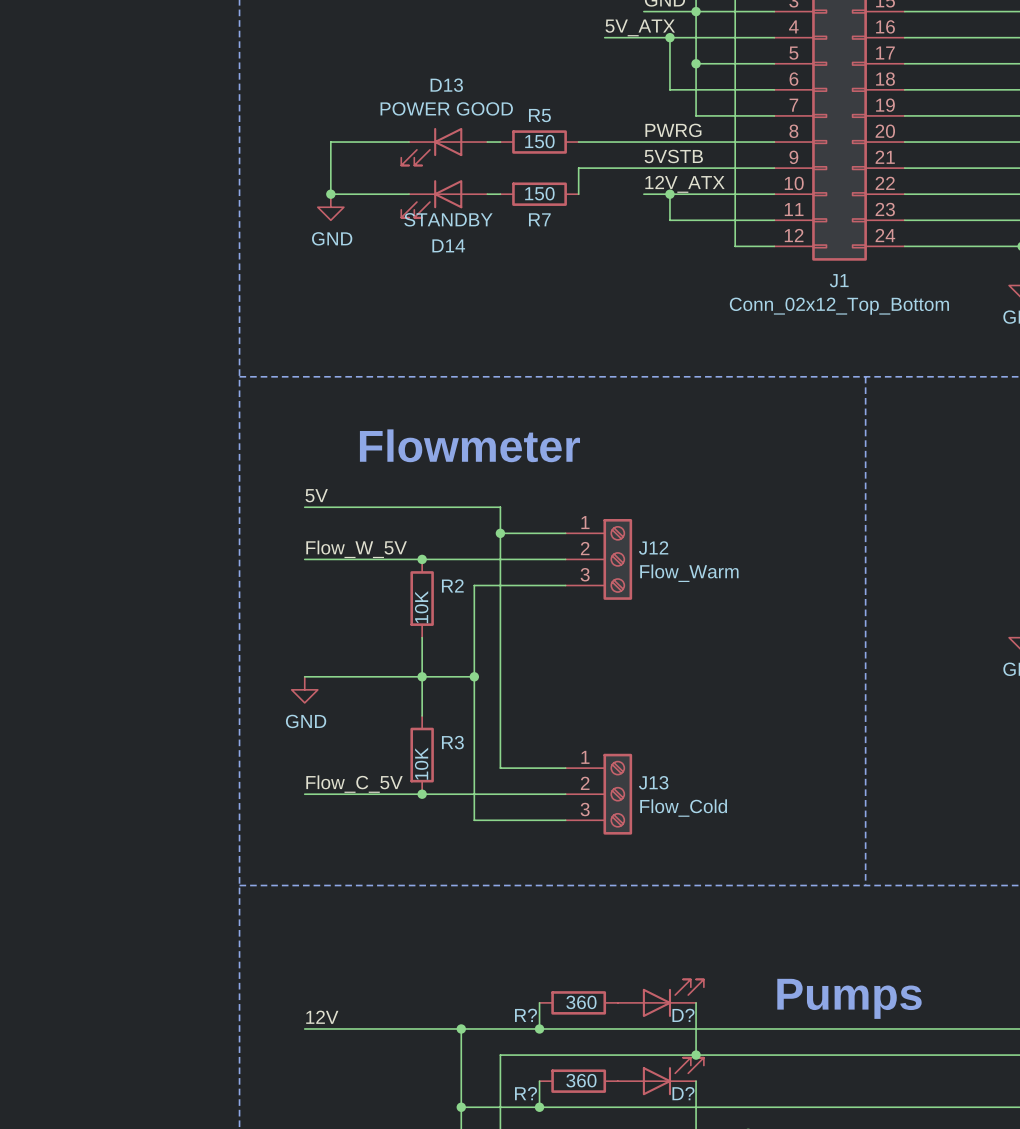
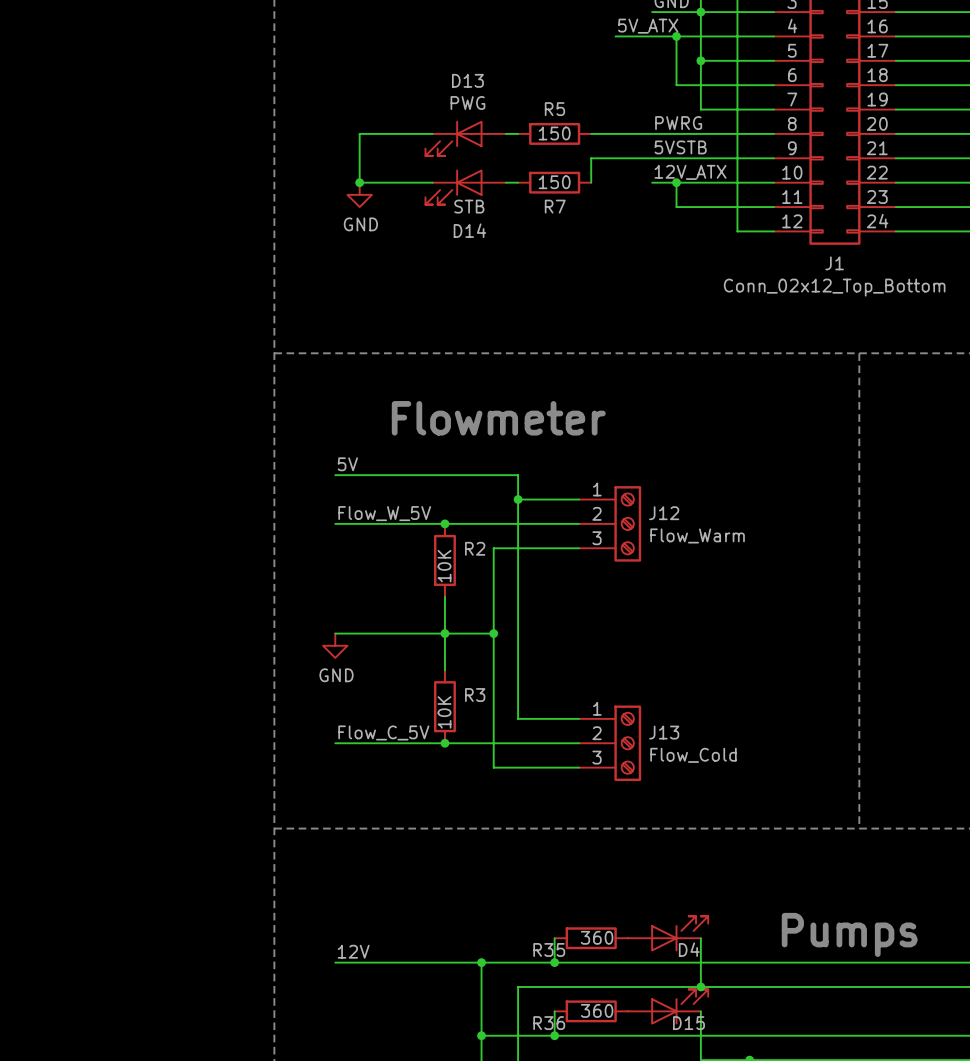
D13 value: POWER GOOD (446, 108) -> PWG (467, 103)
D14 value: STANDBY (448, 219) -> STB (469, 206)
R? name: R? (525, 1015) -> R35 (549, 949)
D? name: D? (683, 1015) -> D4 (689, 949)
R? name: R? (525, 1093) -> R36 (549, 1023)
D? name: D? (683, 1093) -> D15 (688, 1023)

